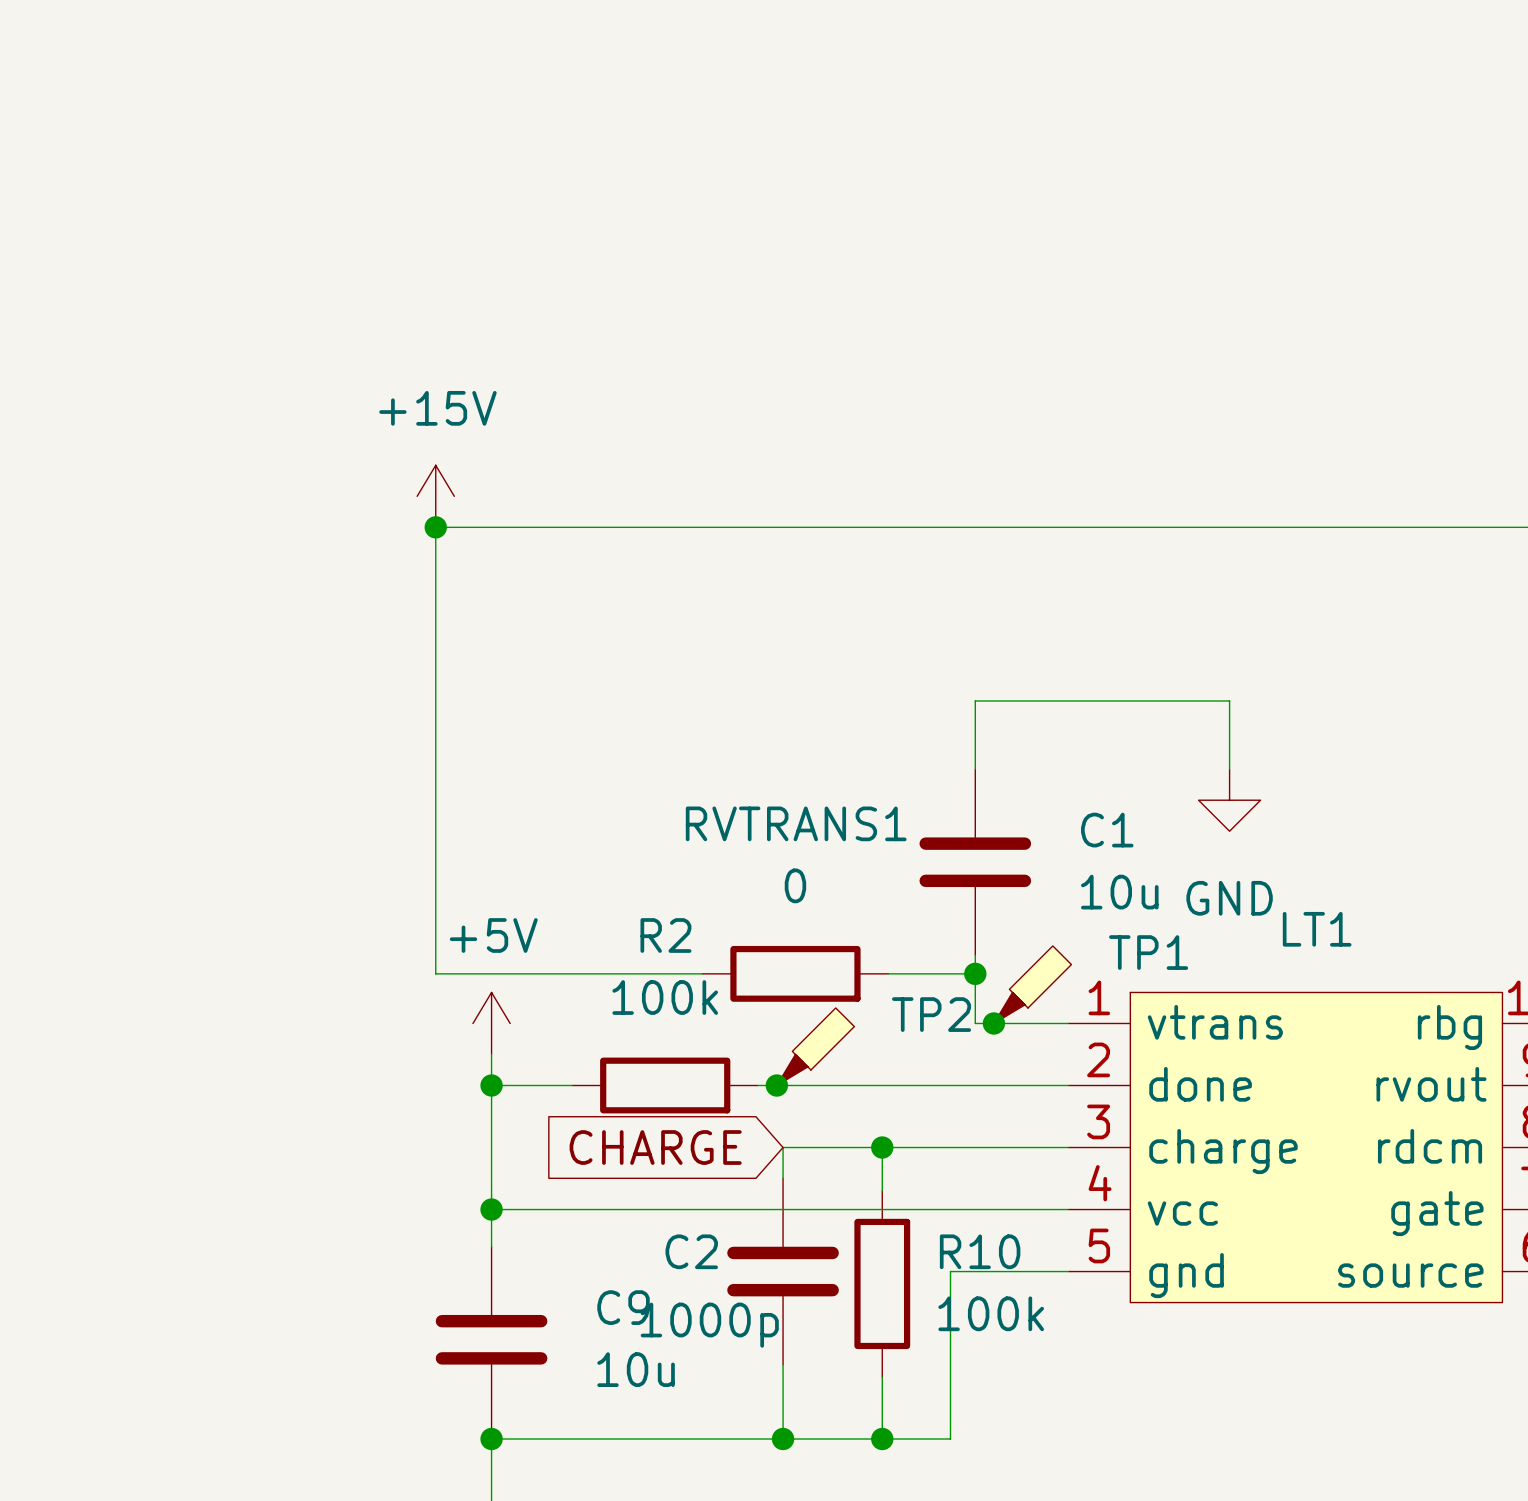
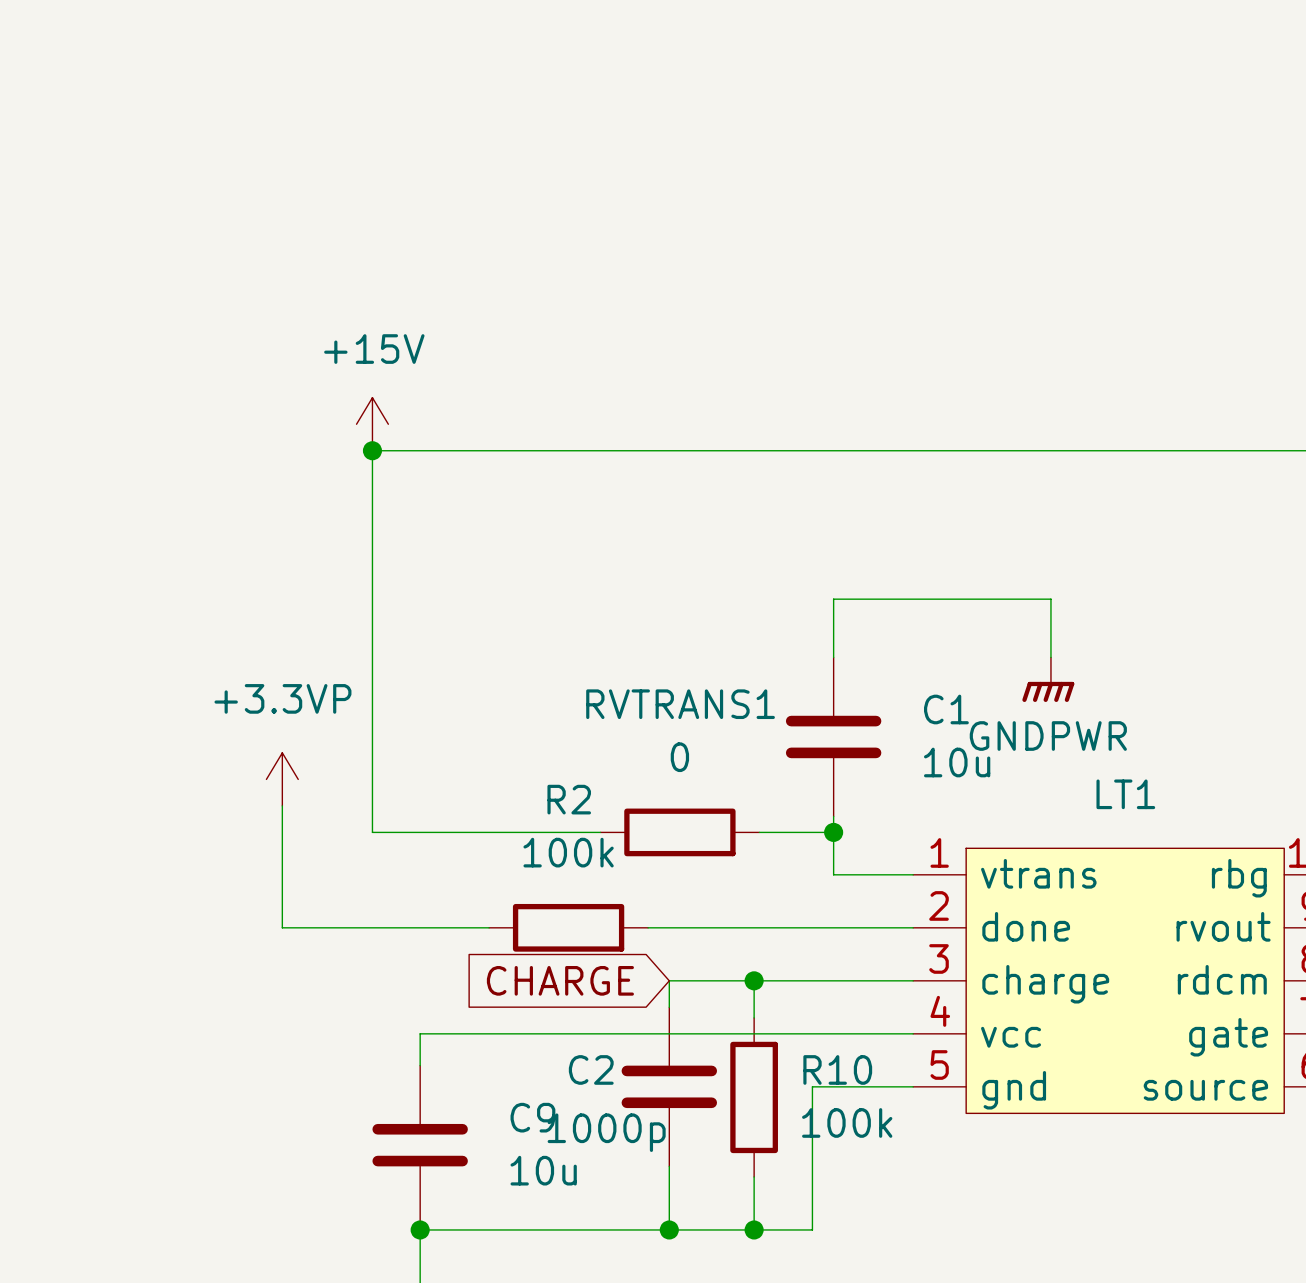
power symbol: GND (1229, 800) -> GNDPWR (1048, 679)
power symbol: none -> +3.3VP (282, 779)
wire: none -> (282, 805) (282, 927) (420, 927)
TP1: (1032, 984) -> none
power symbol: +5V (491, 1023) -> none
junction: (993, 1023) -> none
TP2: (815, 1046) -> none
wire: (491, 1054) (491, 1209) -> none
junction: (491, 1085) -> none
junction: (776, 1085) -> none
junction: (491, 1209) -> none

